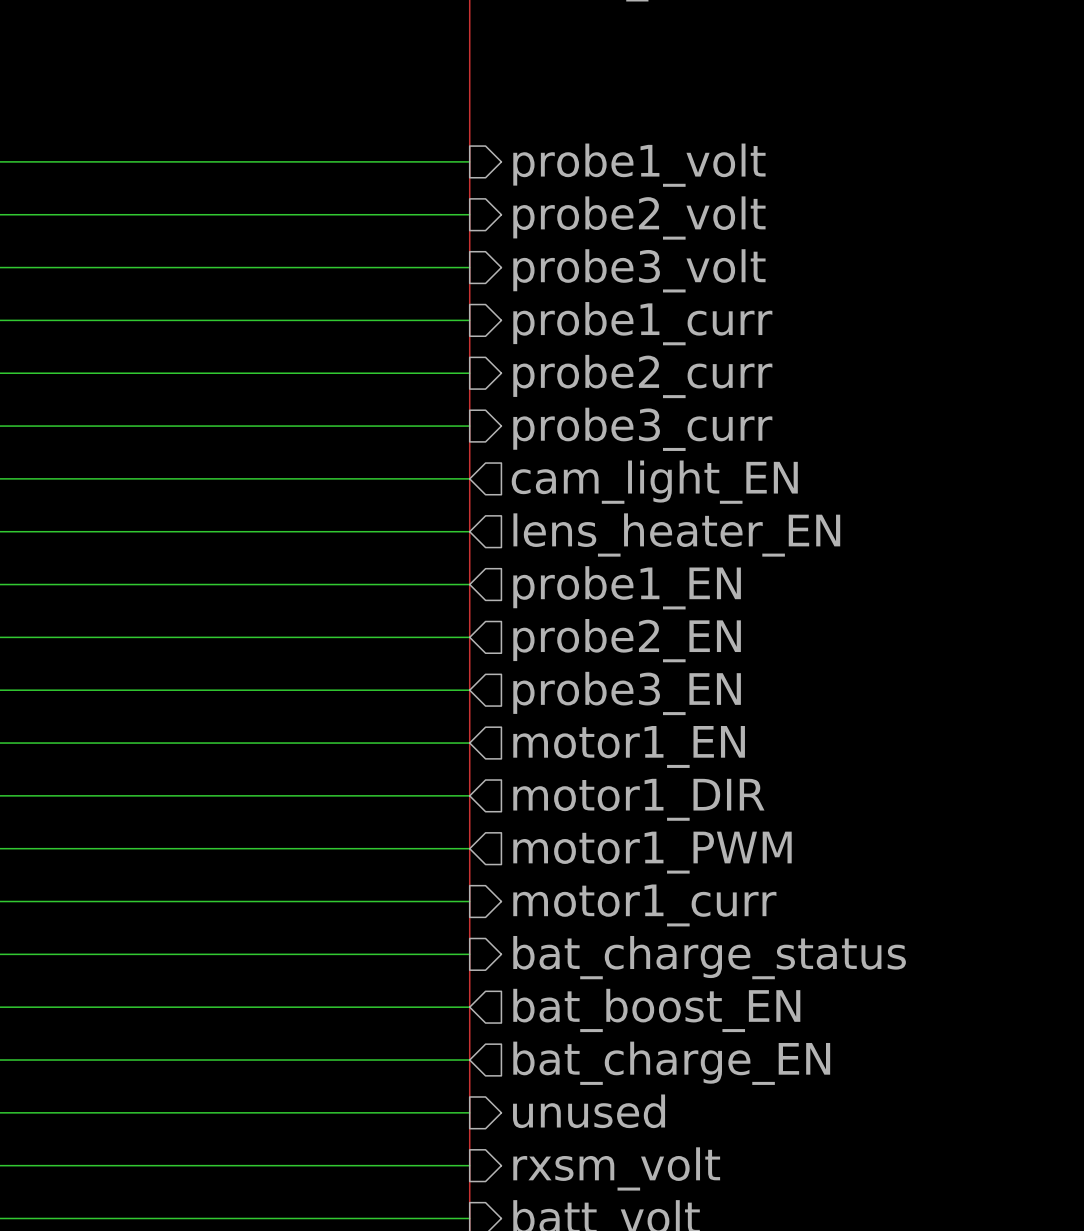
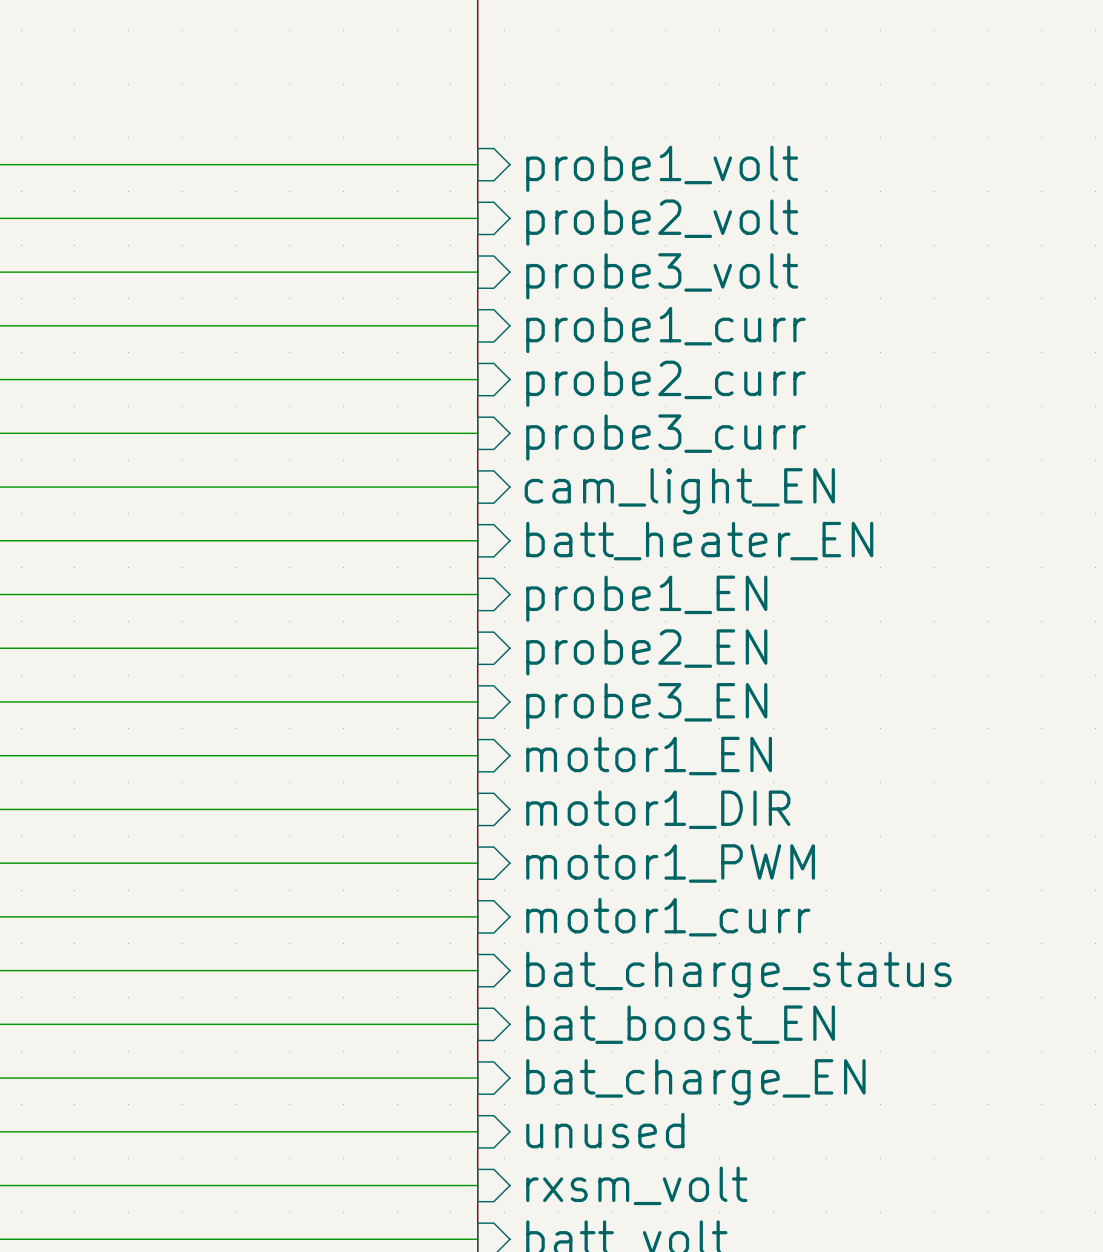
sheet pin shape: output (654, 482) -> input (679, 491)
sheet pin shape: output (676, 534) -> input (699, 541)
sheet pin: lens_heater_EN (676, 534) -> batt_heater_EN (699, 541)
sheet pin shape: output (627, 587) -> input (646, 598)
sheet pin shape: output (627, 640) -> input (646, 652)
sheet pin shape: output (627, 693) -> input (646, 706)
sheet pin shape: output (629, 746) -> input (649, 756)
sheet pin shape: output (638, 799) -> input (658, 809)
sheet pin shape: output (652, 852) -> input (670, 863)
sheet pin shape: output (656, 1010) -> input (680, 1024)
sheet pin shape: output (671, 1063) -> input (695, 1082)

